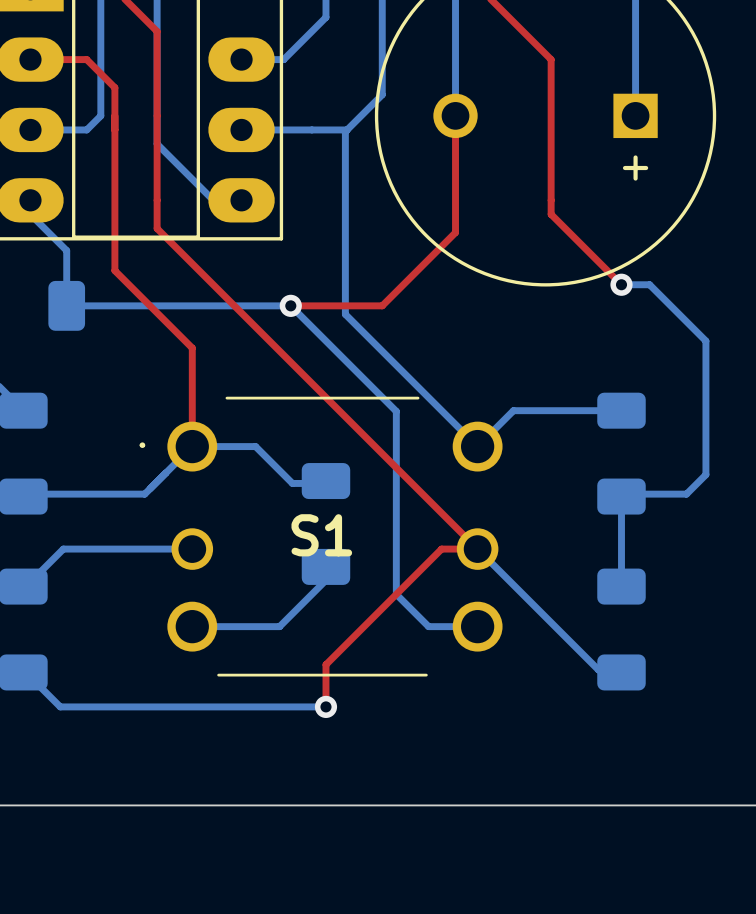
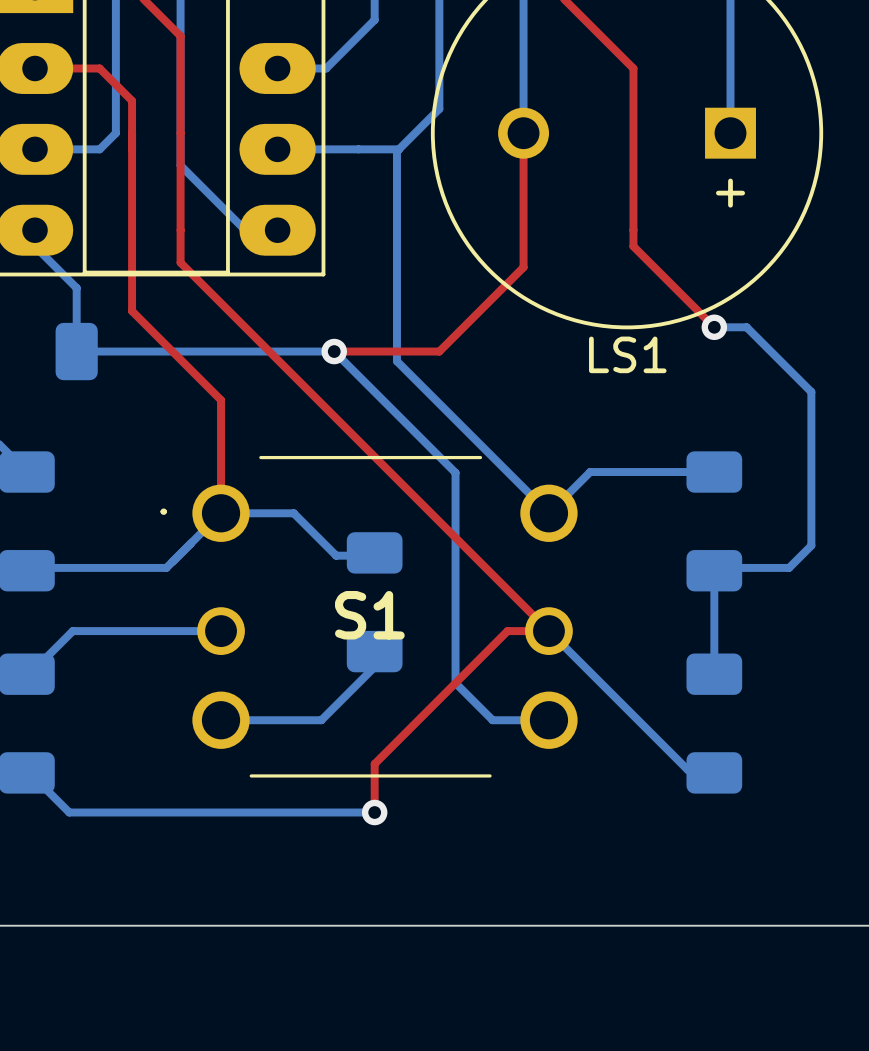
LS1 name: none -> LS1 (627, 354)

